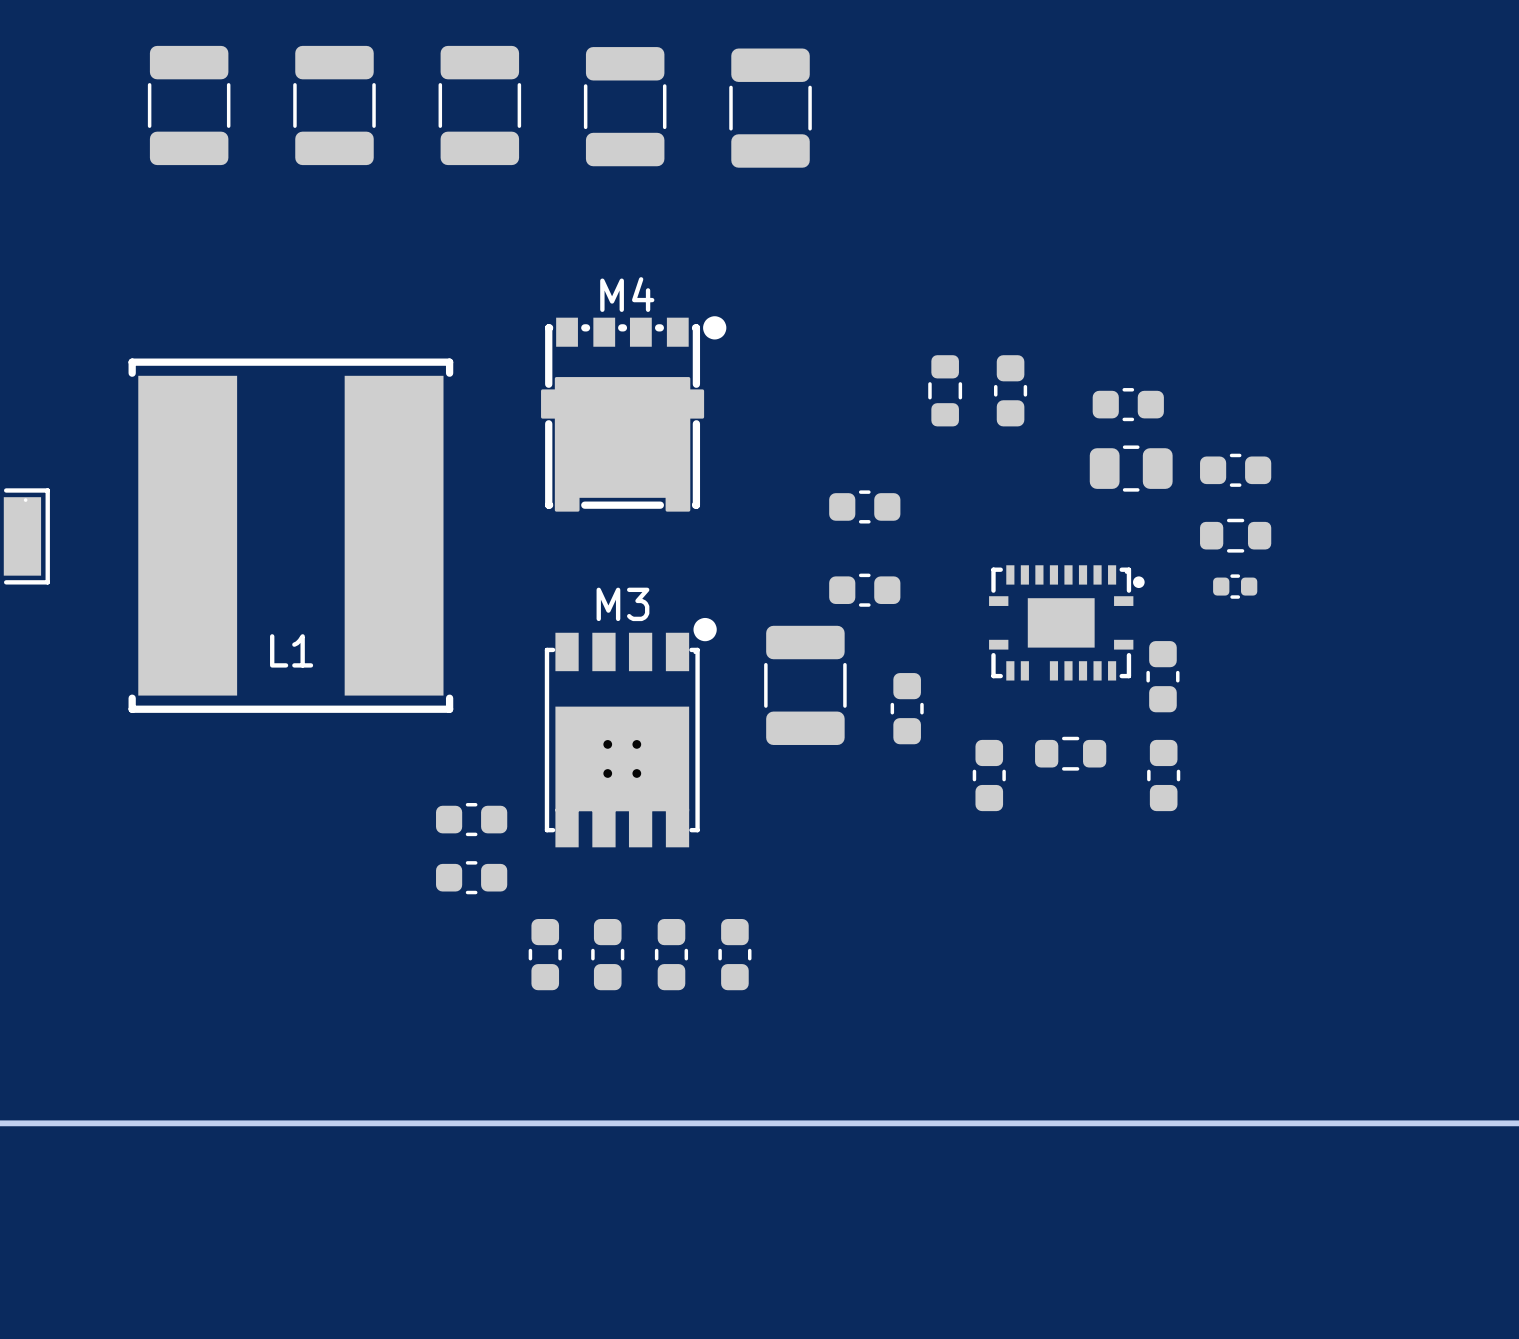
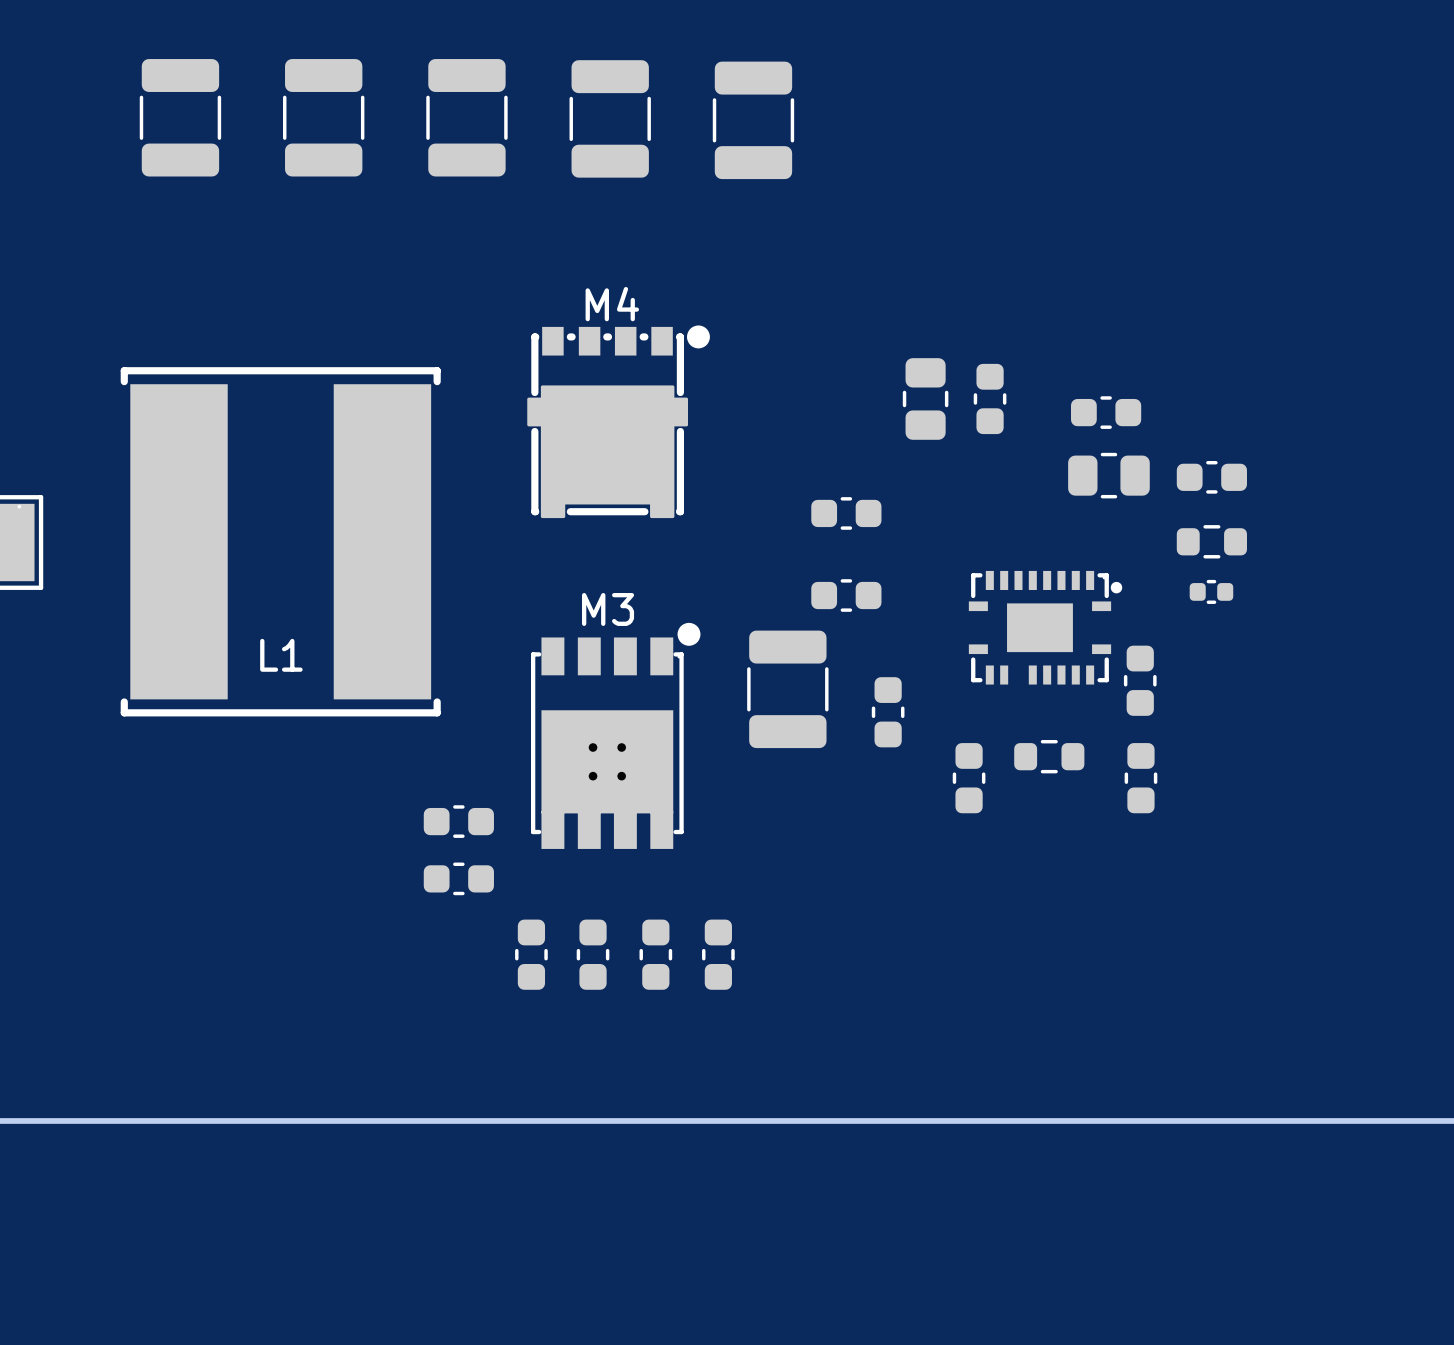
part footprint: [928, 355, 963, 427] -> [902, 358, 949, 440]

